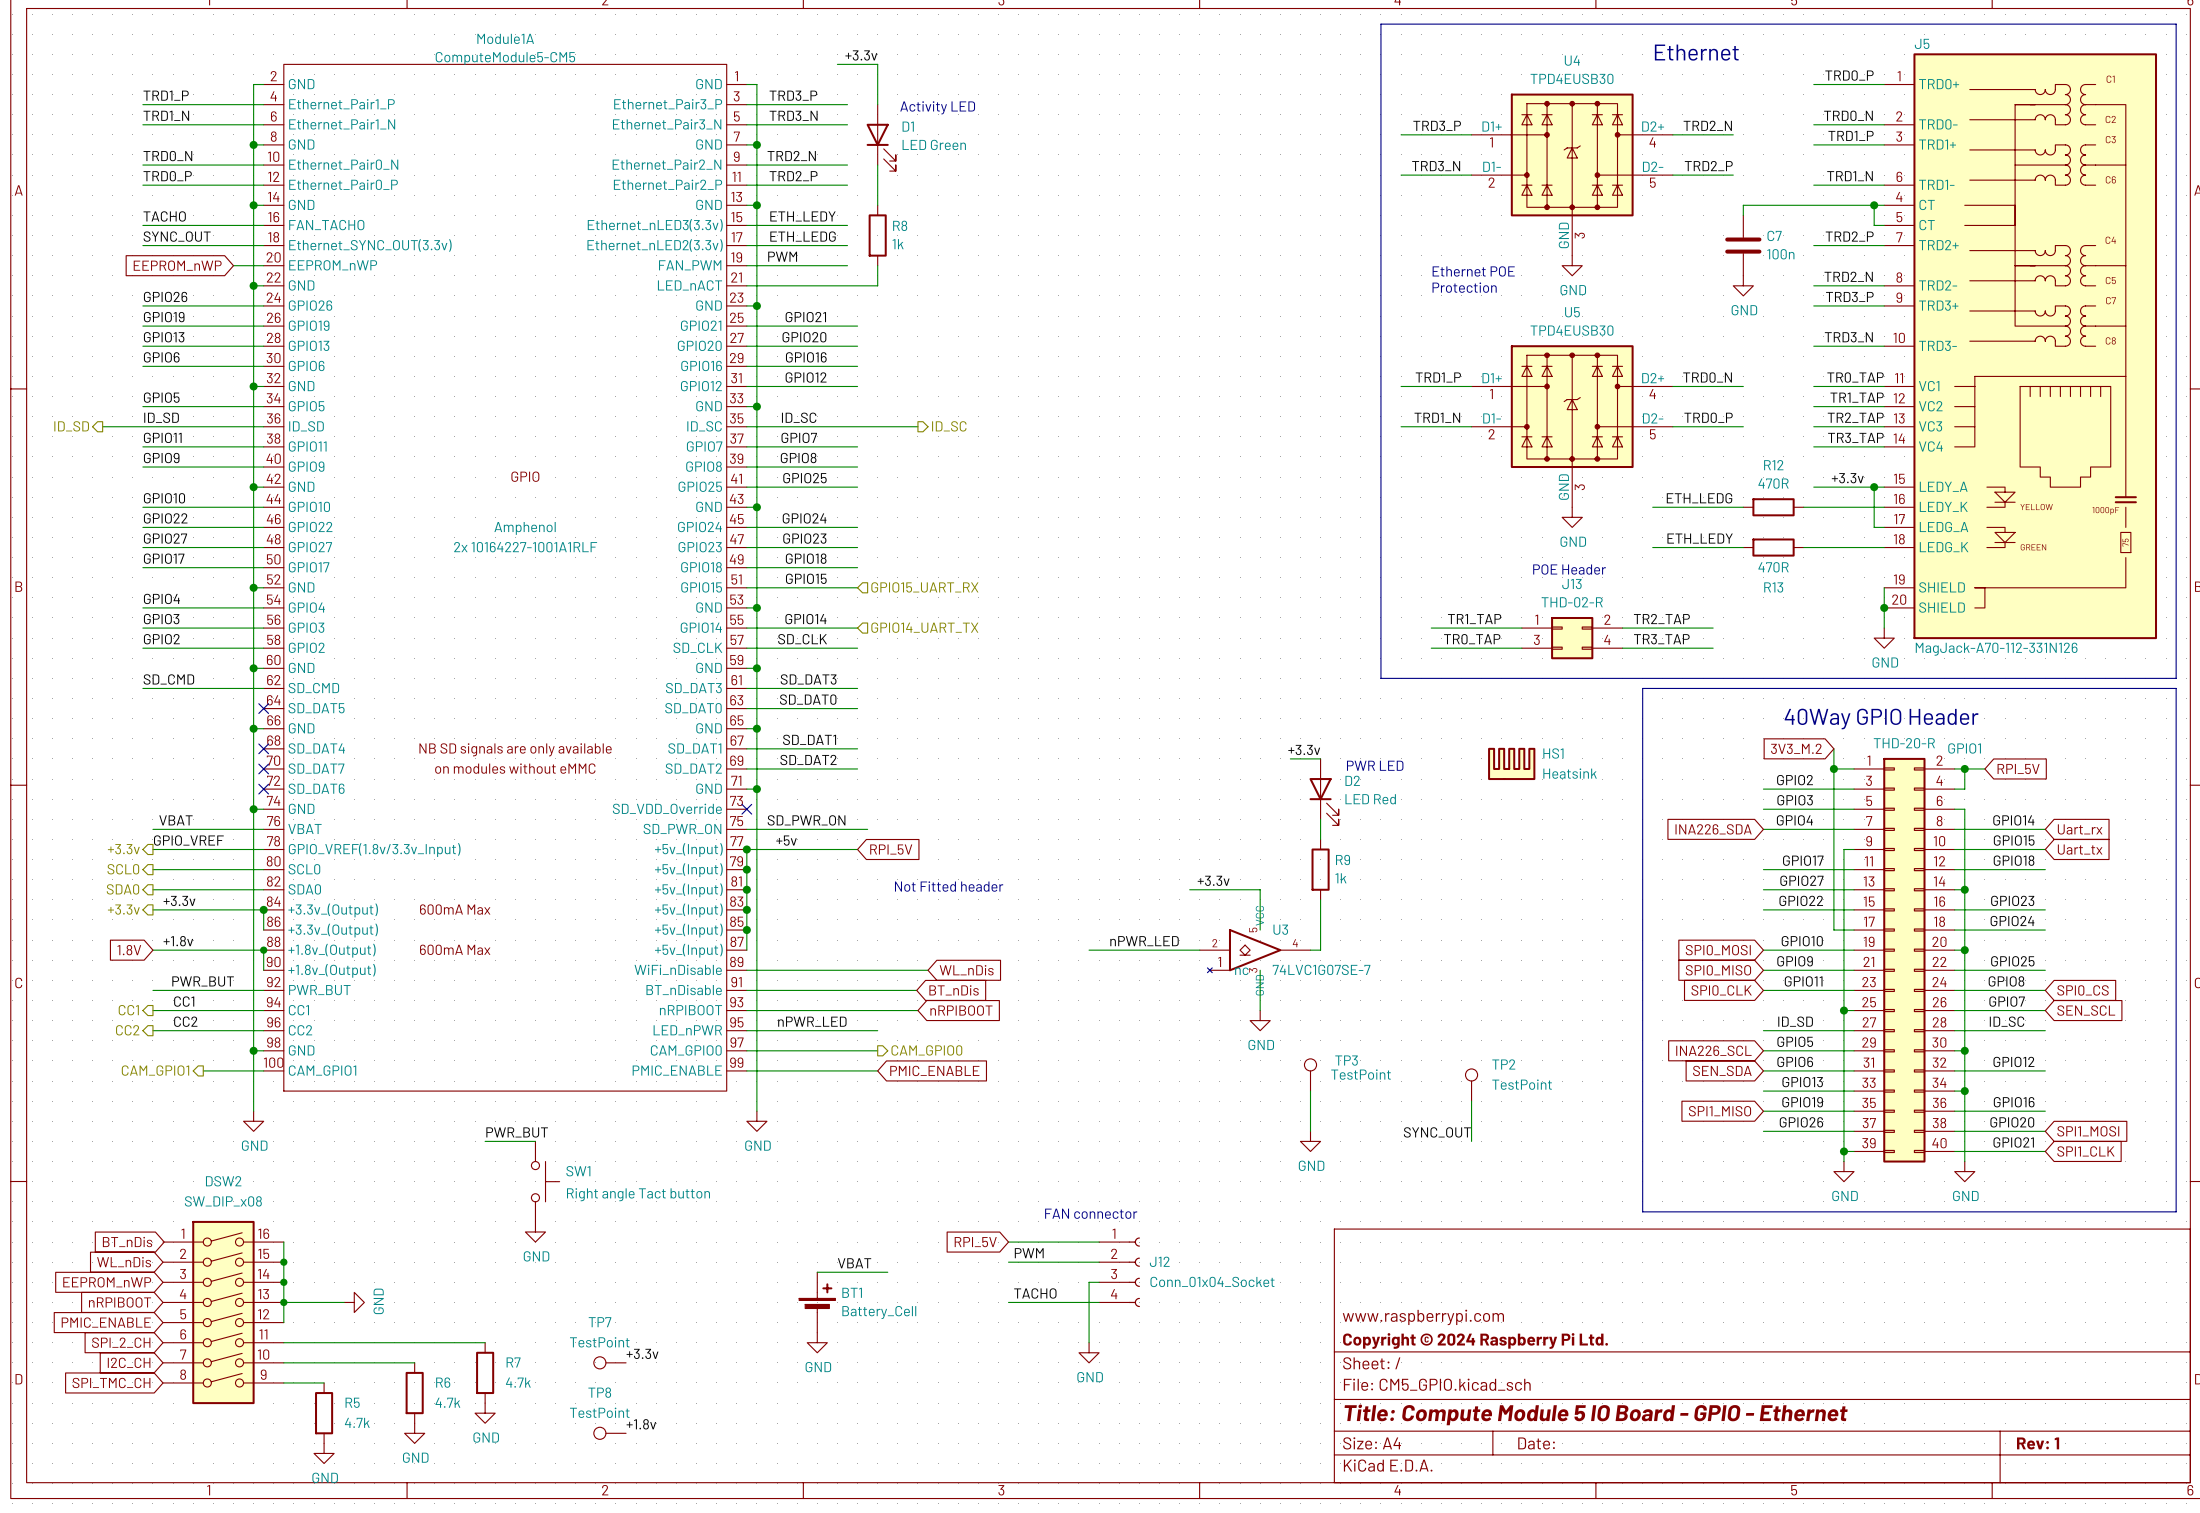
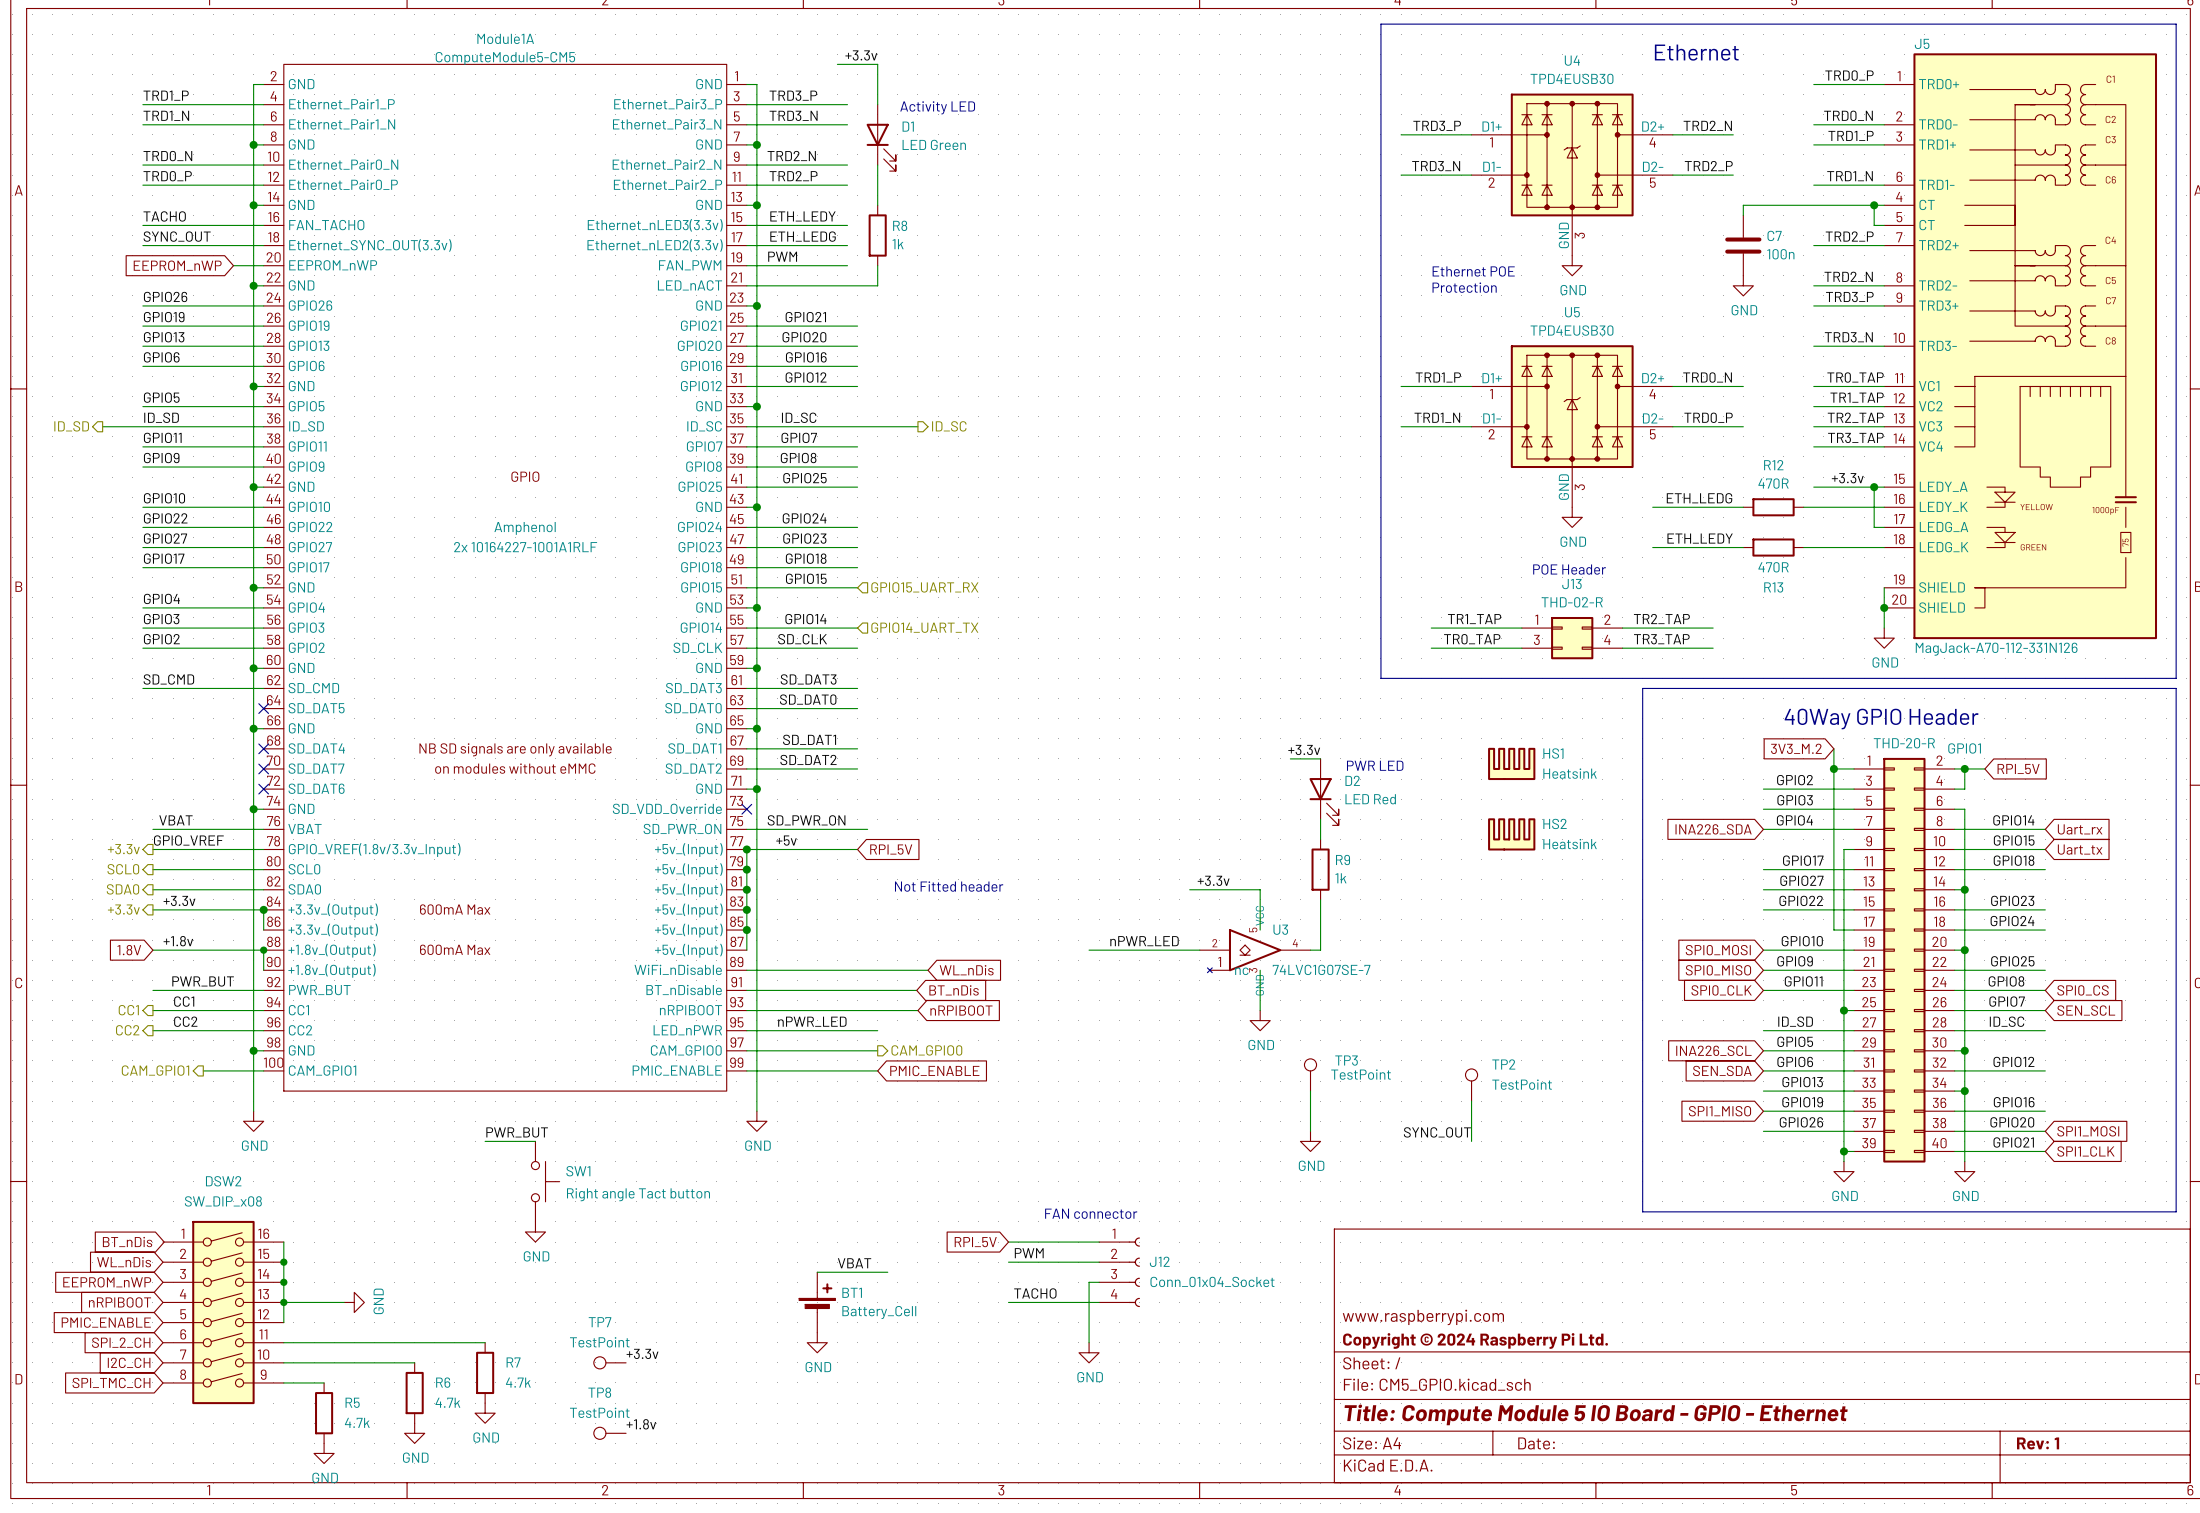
HS2: none -> Heatsink (1511, 834)

